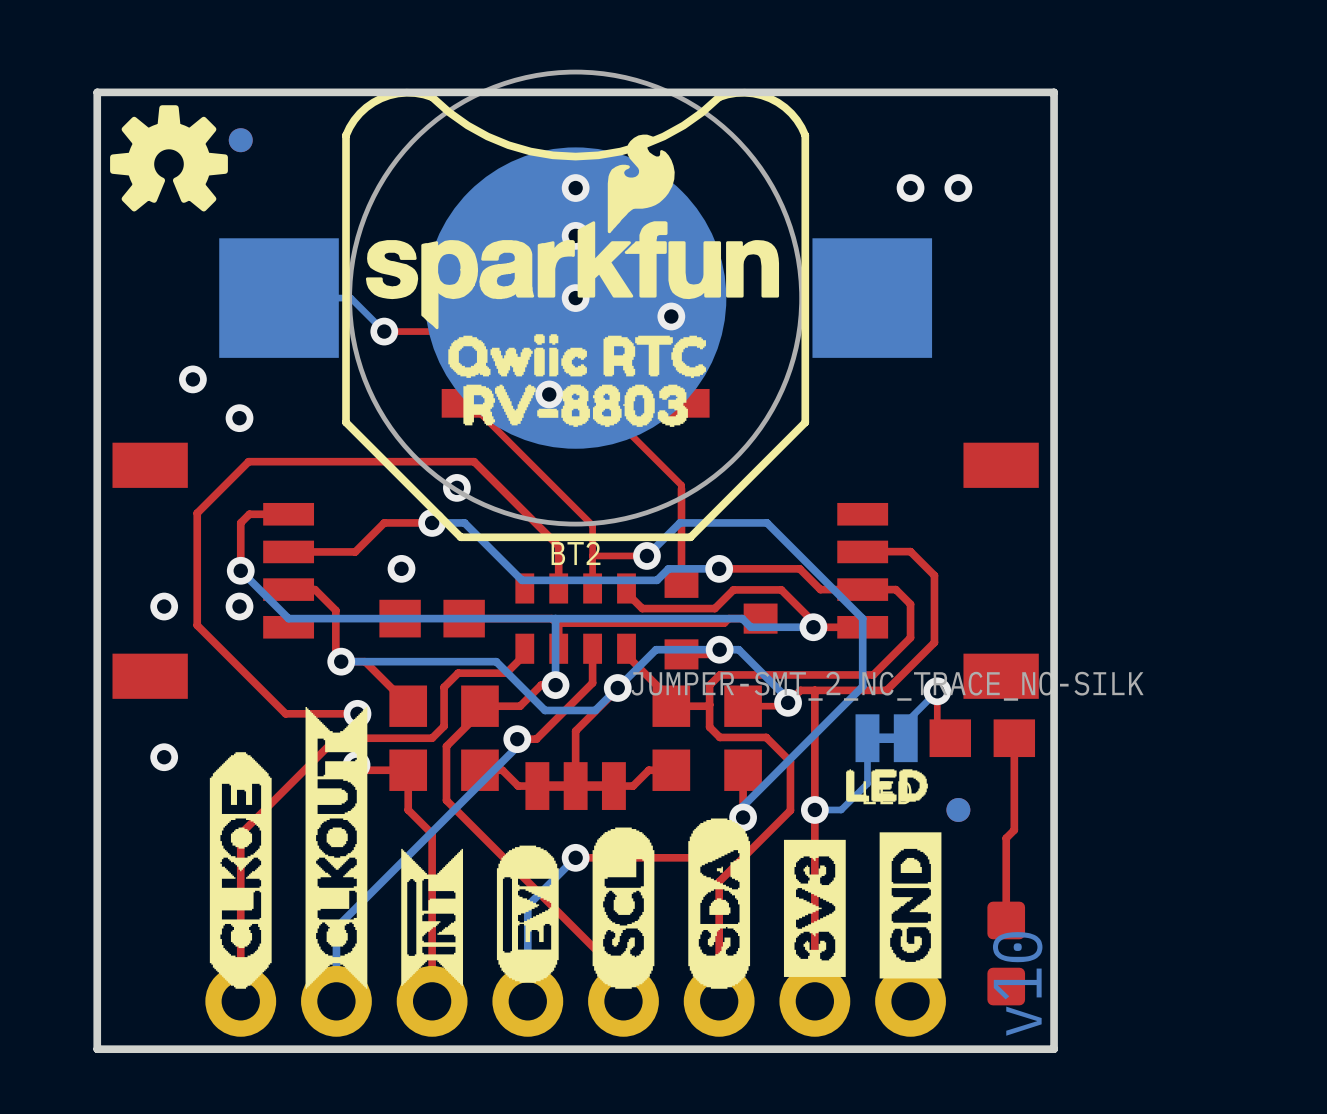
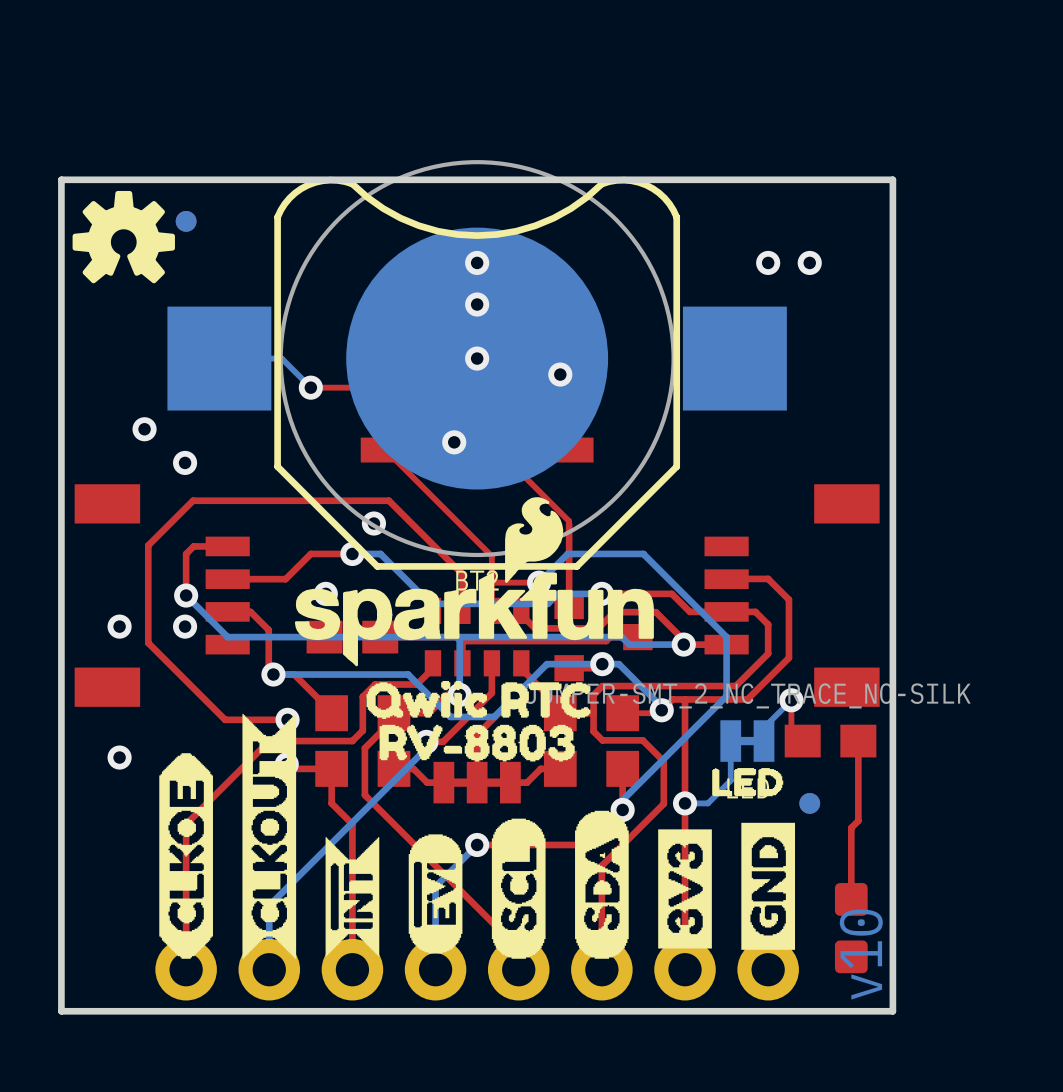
drawing position: (572, 231) -> (474, 581)
drawing position: (577, 356) -> (478, 699)
drawing position: (575, 405) -> (477, 743)

